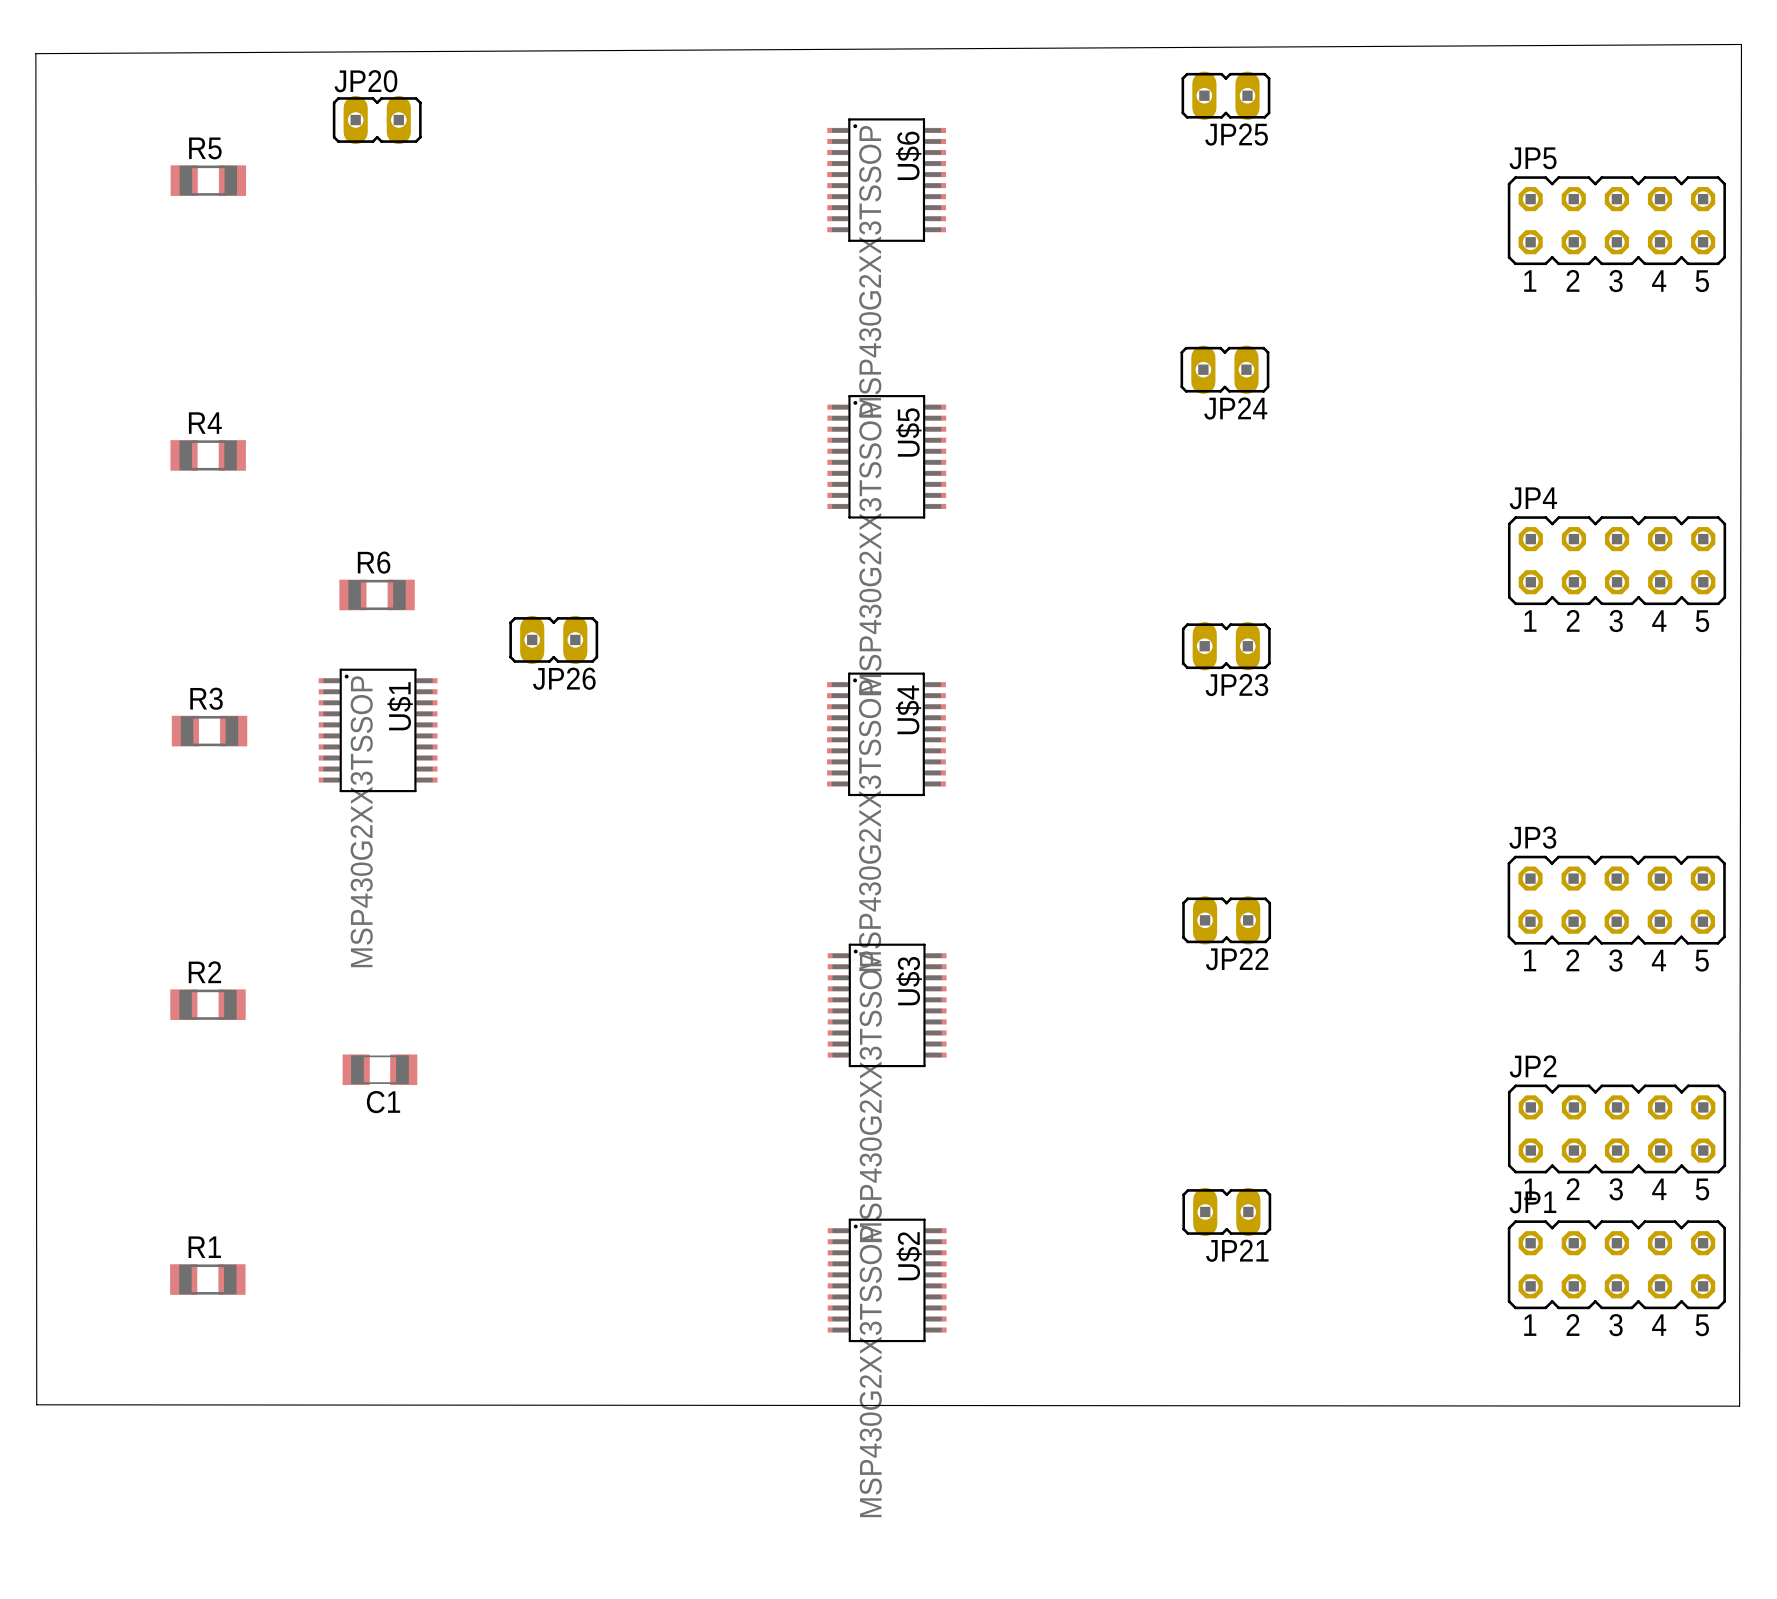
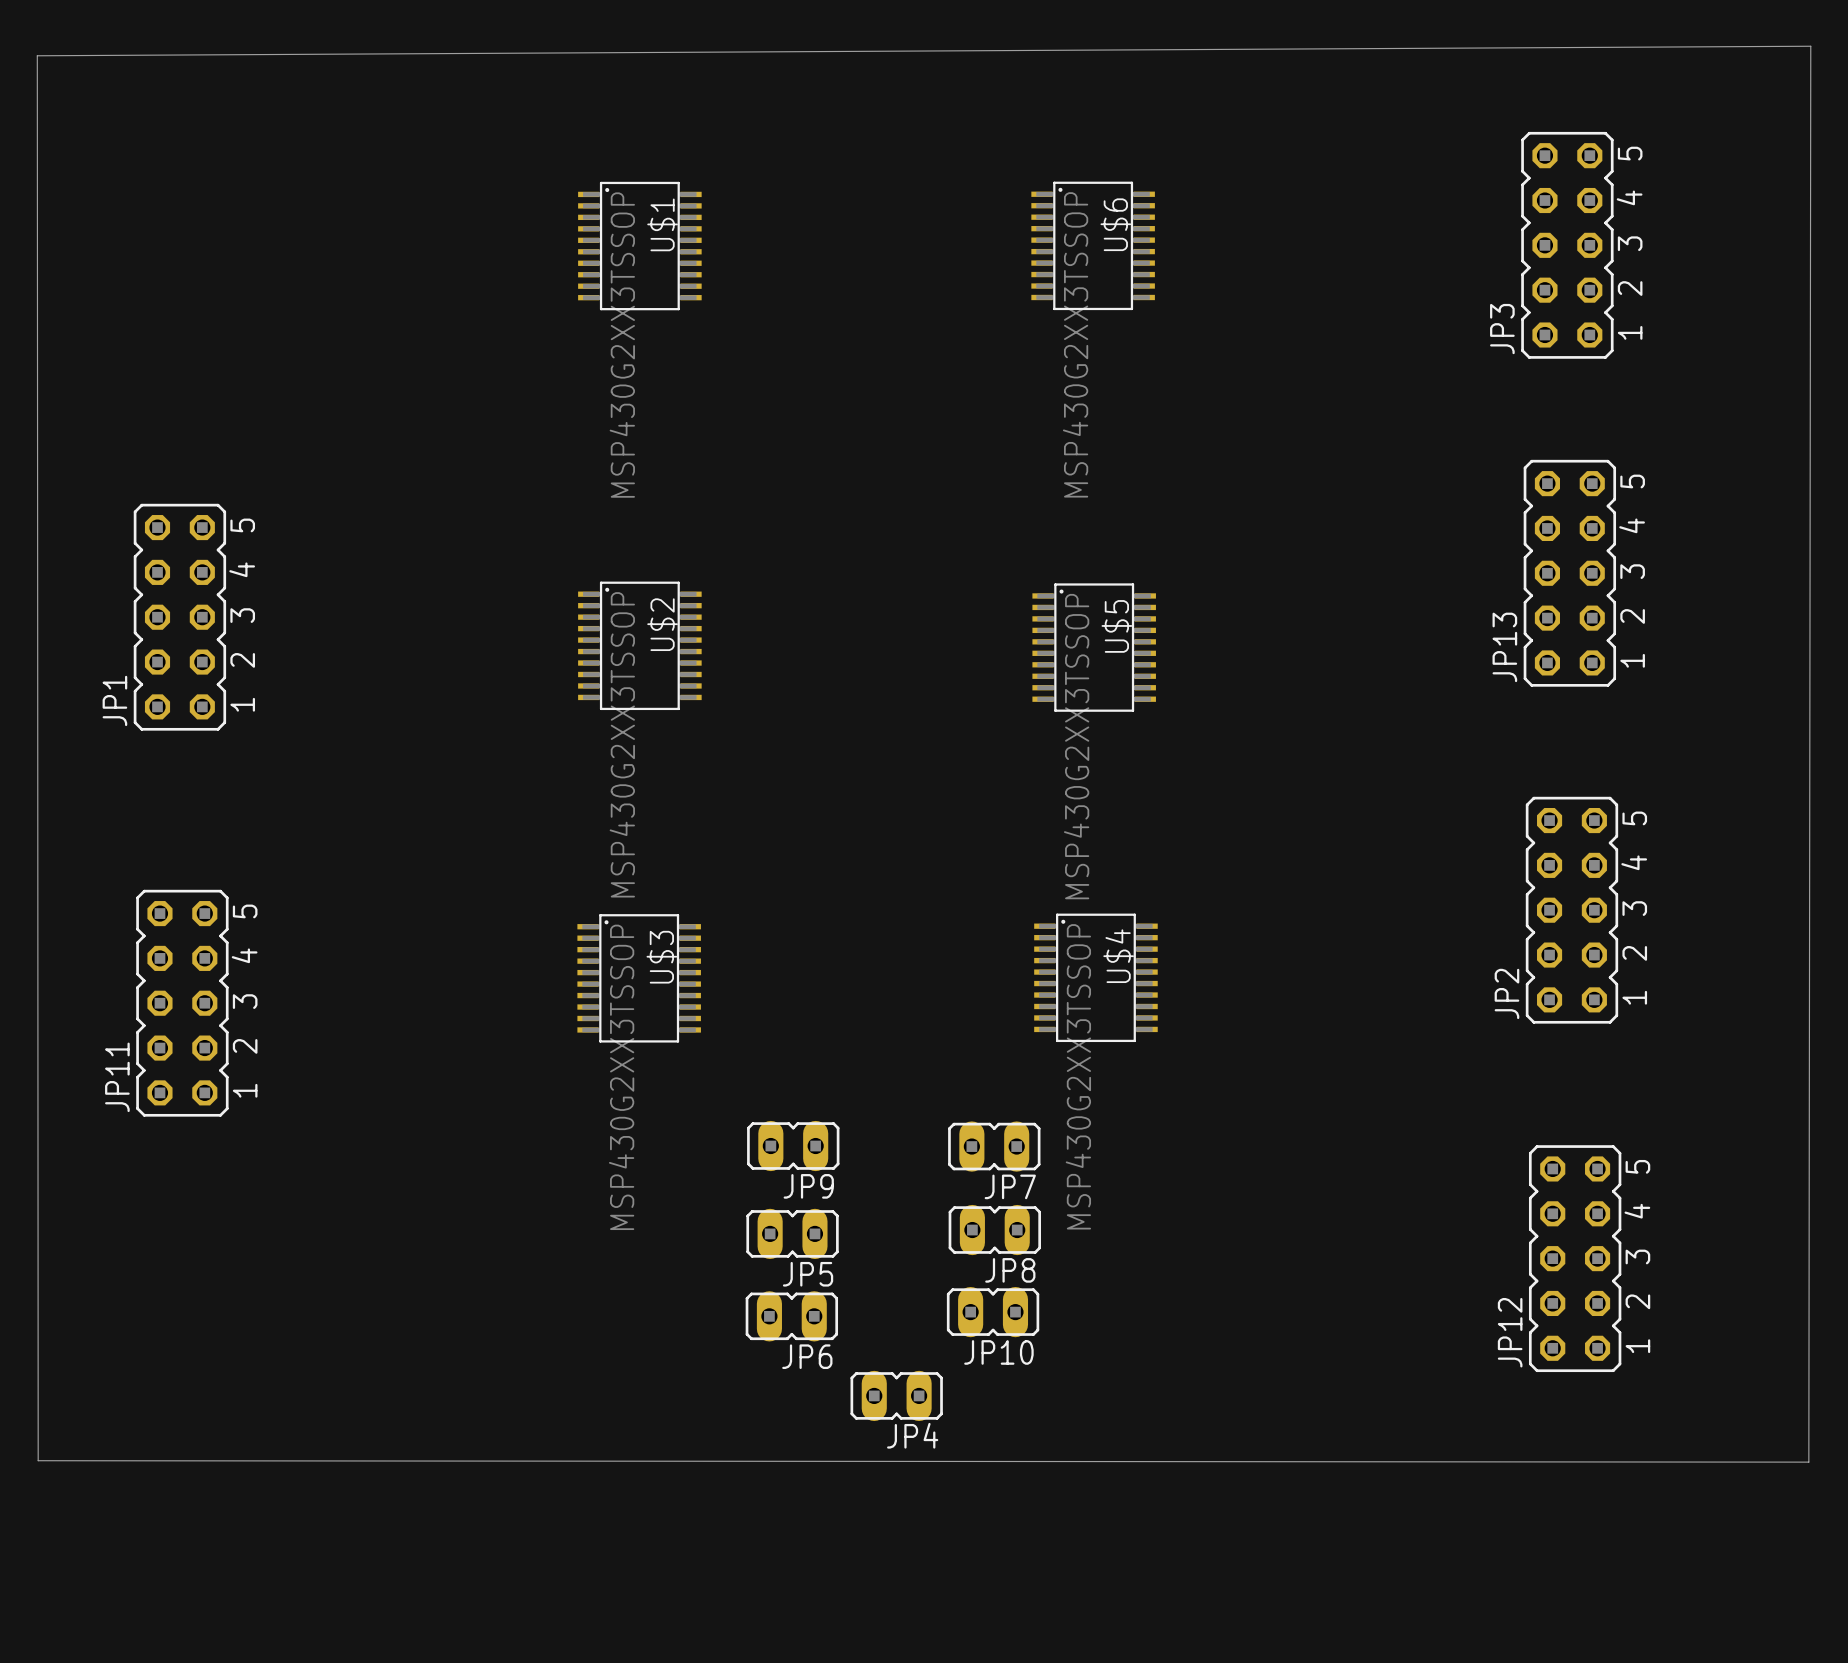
JP25: (1225, 95) -> none
JP20: (377, 120) -> none
JP5 name position: JP5 (1533, 158) -> JP5 (808, 1274)
JP5 footprint: [1507, 176, 1726, 266] -> [746, 1208, 839, 1260]
R5: (208, 180) -> none
U$6 position: (886, 180) -> (1093, 245)
JP24: (1224, 369) -> none
R4: (208, 455) -> none
U$5 position: (886, 456) -> (1094, 647)
JP4 name position: JP4 (1533, 498) -> JP4 (912, 1435)
JP4 footprint: [1507, 516, 1727, 606] -> [850, 1370, 943, 1422]
JP13: none -> (1569, 573)
R6: (377, 594) -> none
JP26: (553, 639) -> none
JP23: (1226, 646) -> none
U$1 position: (378, 730) -> (639, 246)
R3: (209, 731) -> none
U$4 position: (886, 734) -> (1095, 977)
JP3 rotation: 0° (1616, 900) -> 90° counterclockwise (1567, 245)
JP3 position: (1616, 900) -> (1567, 245)
JP22: (1226, 920) -> none
JP11: none -> (182, 1003)
R2: (208, 1004) -> none
U$3 position: (887, 1005) -> (639, 978)
C1: (379, 1069) -> none
JP9: none -> (793, 1146)
JP7: none -> (994, 1146)
JP2 rotation: 0° (1617, 1128) -> 90° counterclockwise (1571, 910)
JP2 position: (1617, 1128) -> (1571, 910)
JP8: none -> (994, 1230)
JP12: none -> (1575, 1258)
JP21: (1226, 1211) -> none
JP10: none -> (993, 1312)
JP1 rotation: 0° (1616, 1264) -> 90° counterclockwise (179, 617)
JP1 position: (1616, 1264) -> (179, 617)
JP6: none -> (791, 1316)
R1: (207, 1279) -> none
U$2 position: (887, 1280) -> (639, 645)

